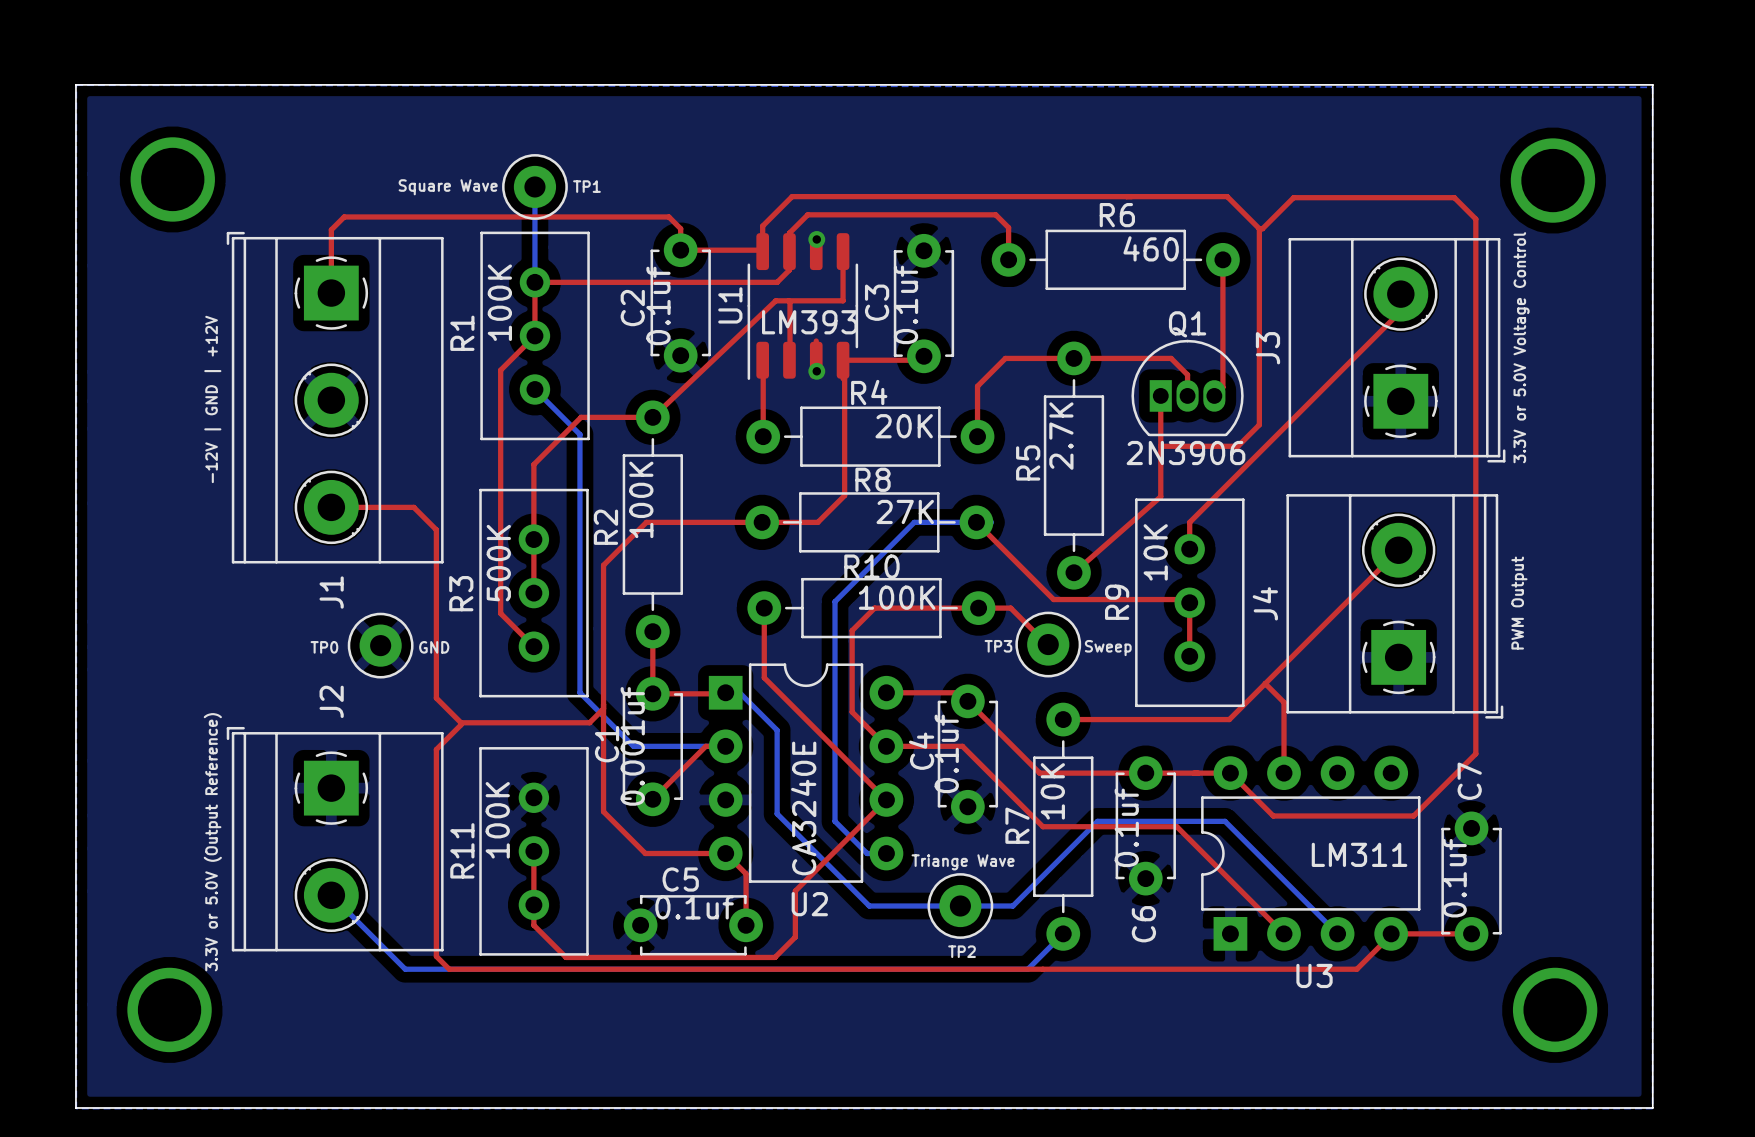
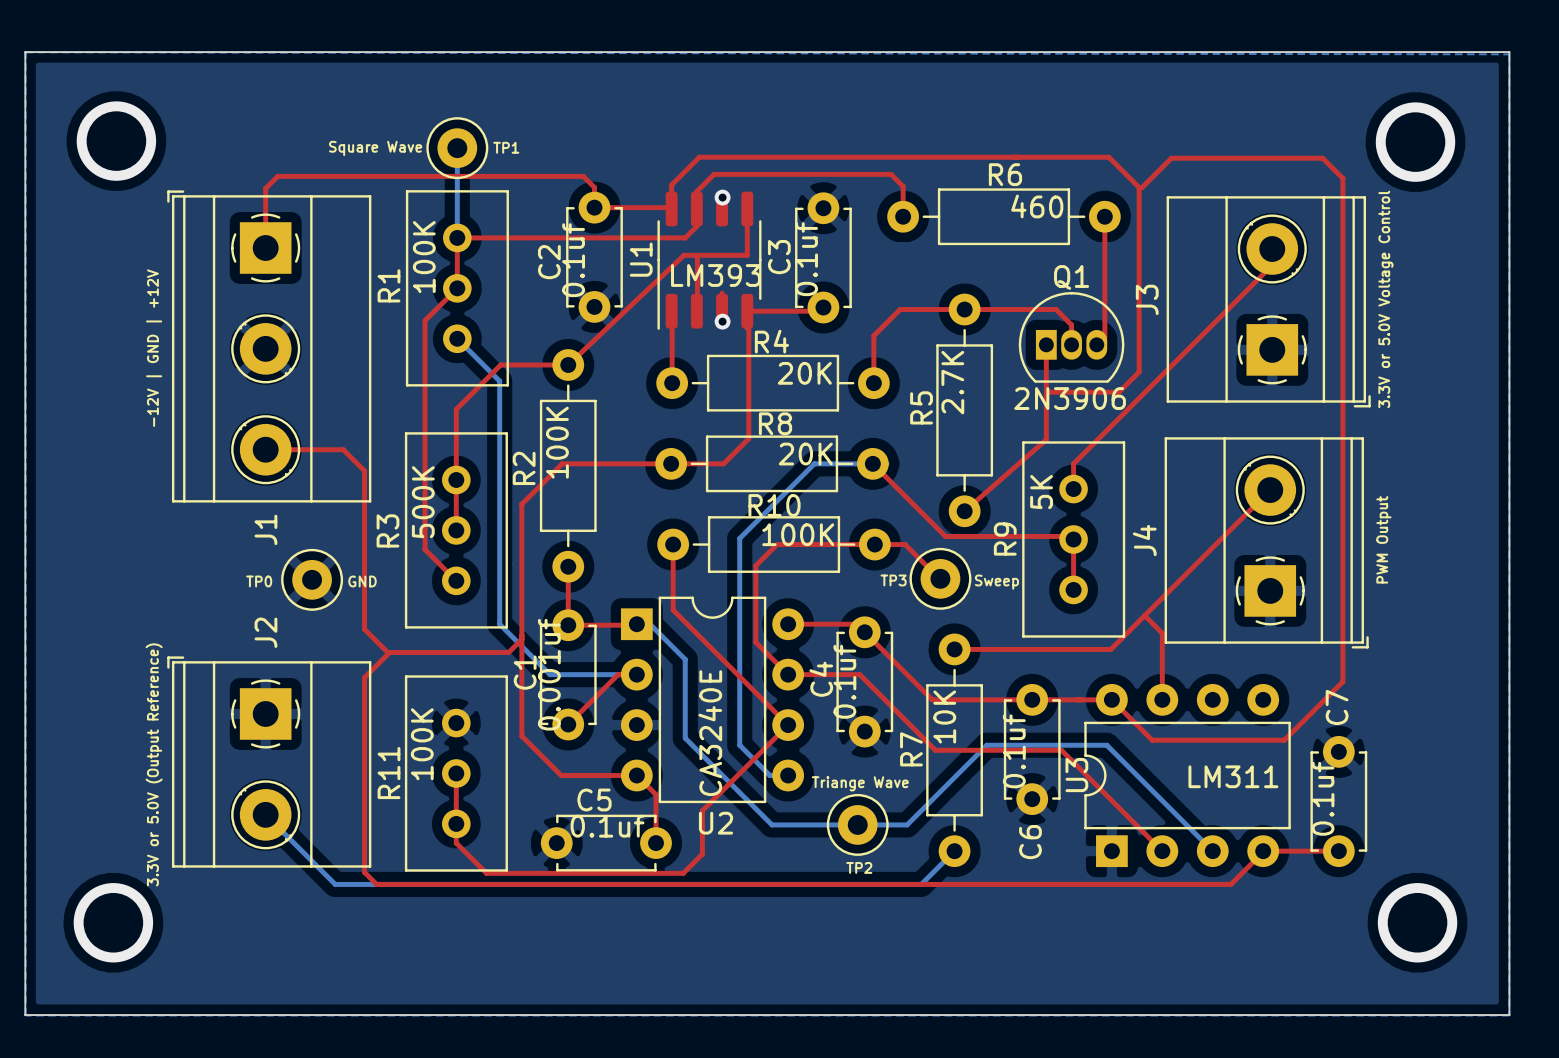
R8 value: 27K (905, 511) -> 20K (805, 454)
R9 value: 10K (1155, 552) -> 5K (1041, 492)
U3 name rotation: 0° (1314, 975) -> 90° counterclockwise (1076, 775)
U3 name position: U3 (1314, 975) -> U3 (1076, 775)

